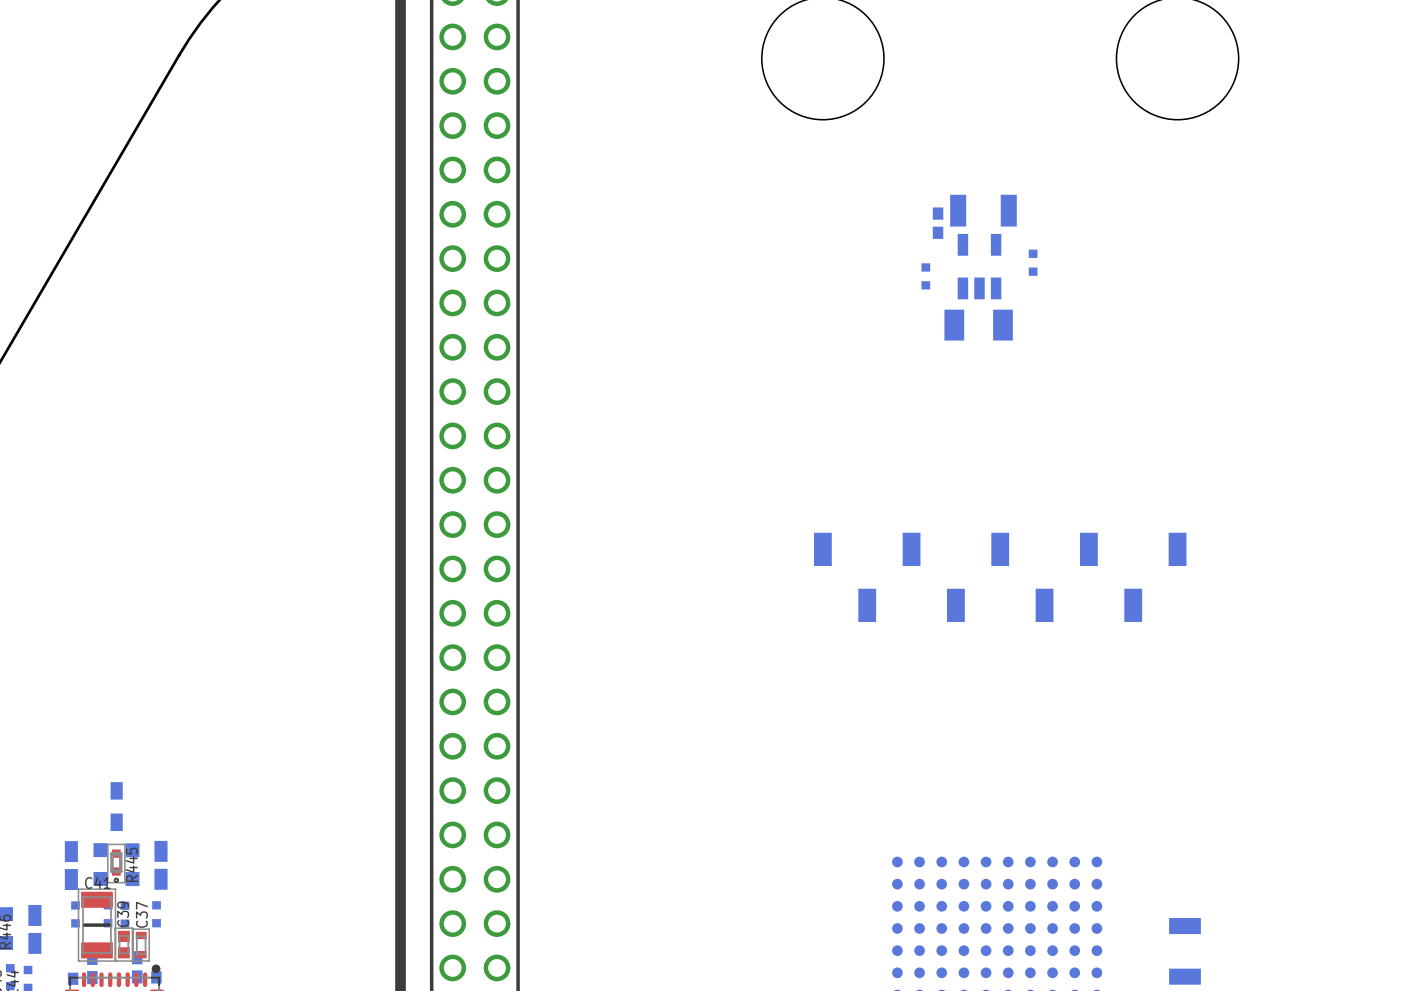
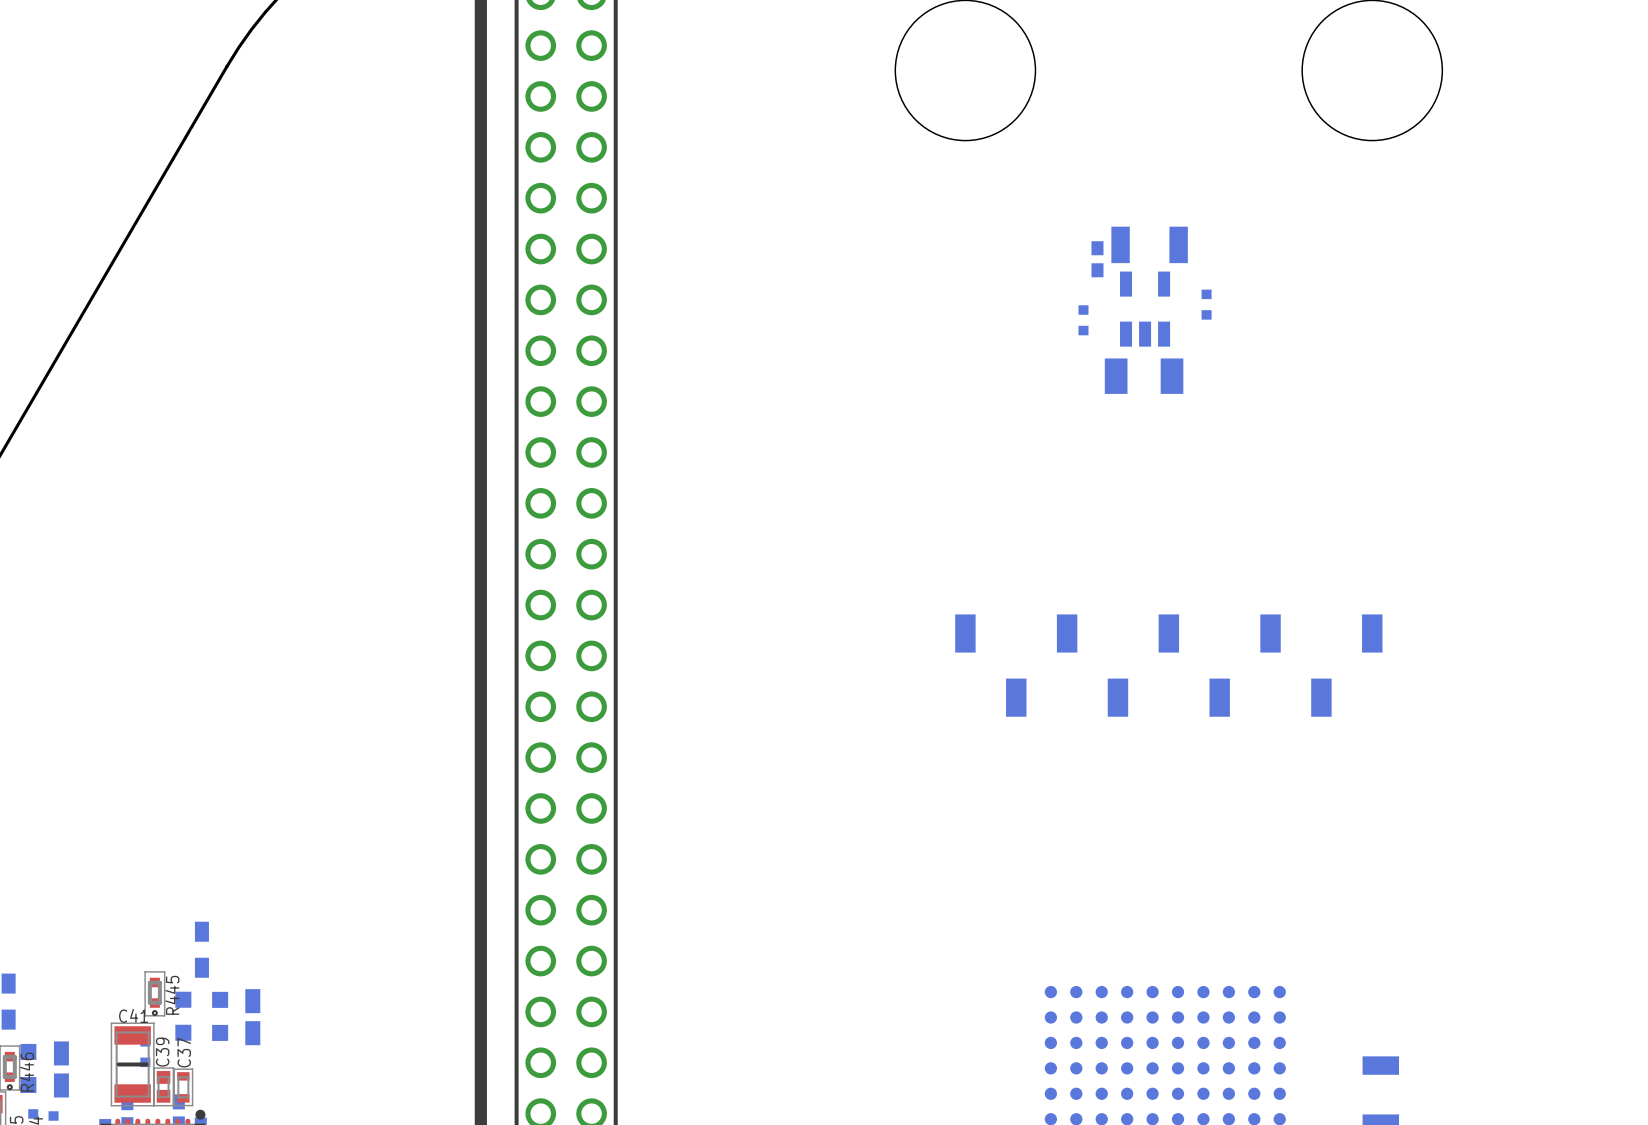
part position: (116, 806) -> (201, 949)
part: (100, 864) -> none
part position: (132, 864) -> (183, 1016)
part: (71, 865) -> none
part position: (161, 865) -> (252, 1017)
part: none -> (220, 1016)
part: (75, 914) -> none
part: (125, 914) -> none
part: (156, 914) -> none

